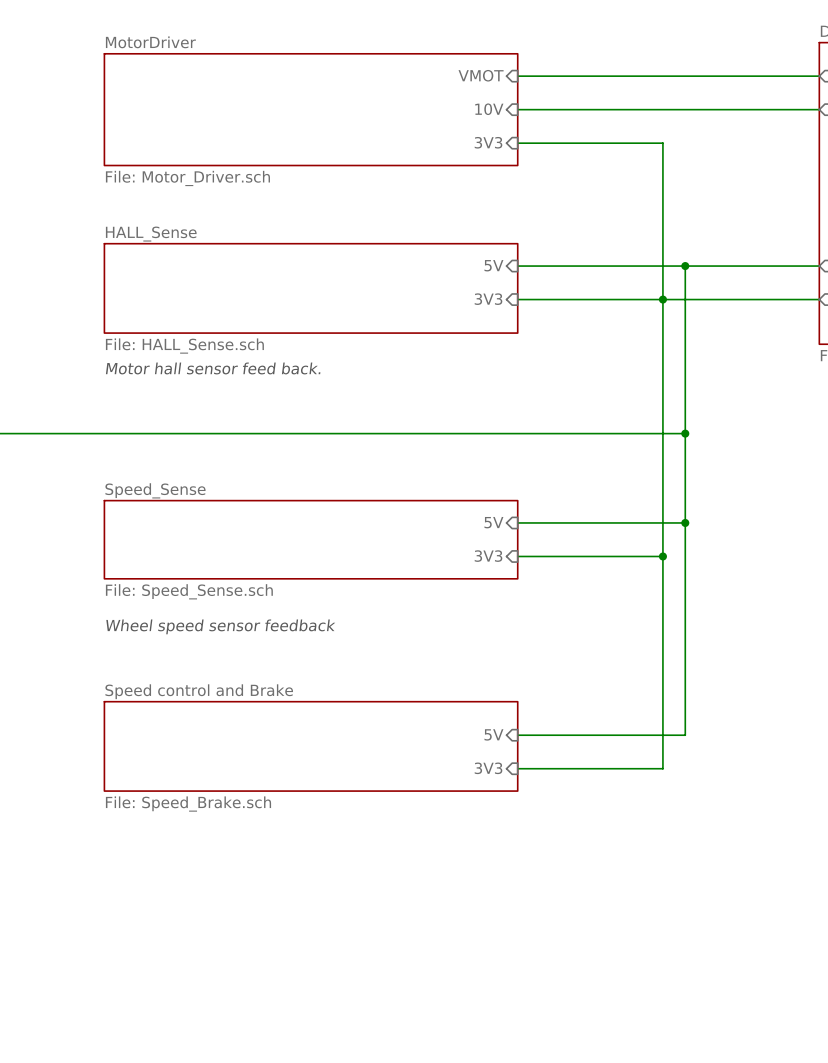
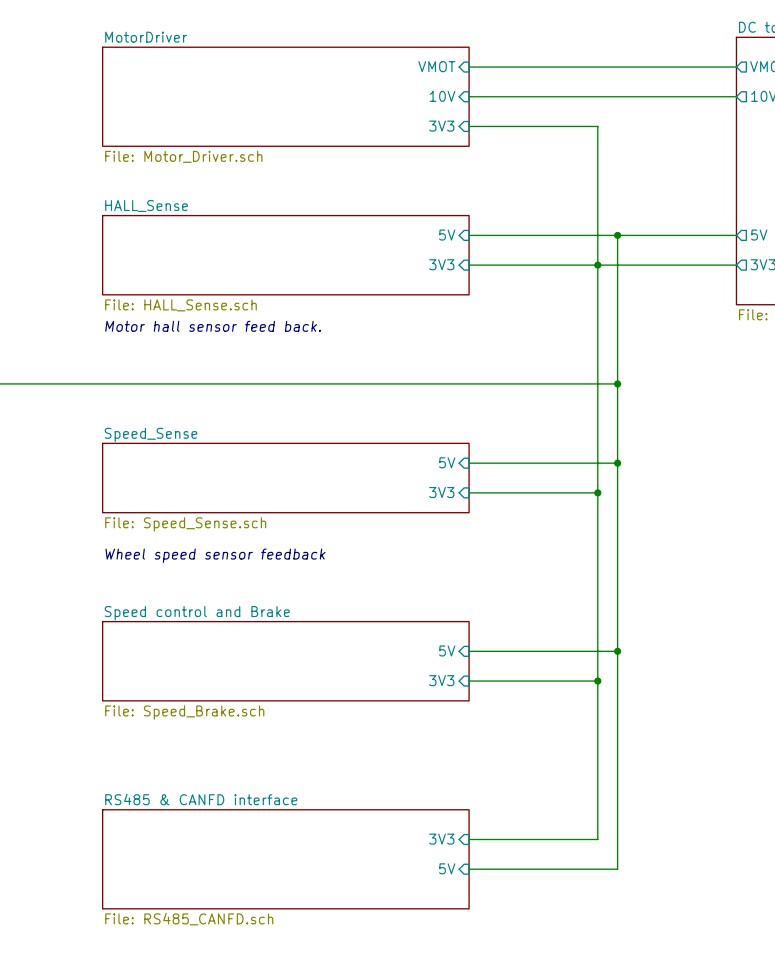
wire: none -> (617, 651) (617, 869) (469, 869)
junction: none -> (617, 651)
wire: none -> (597, 681) (597, 839) (469, 839)
junction: none -> (597, 681)
sheet pin: none -> 3V3 (441, 839)
sheet RS485 & CANFD interface: none -> File: RS485_CANFD.sch (285, 859)
sheet pin: none -> 5V (447, 868)

